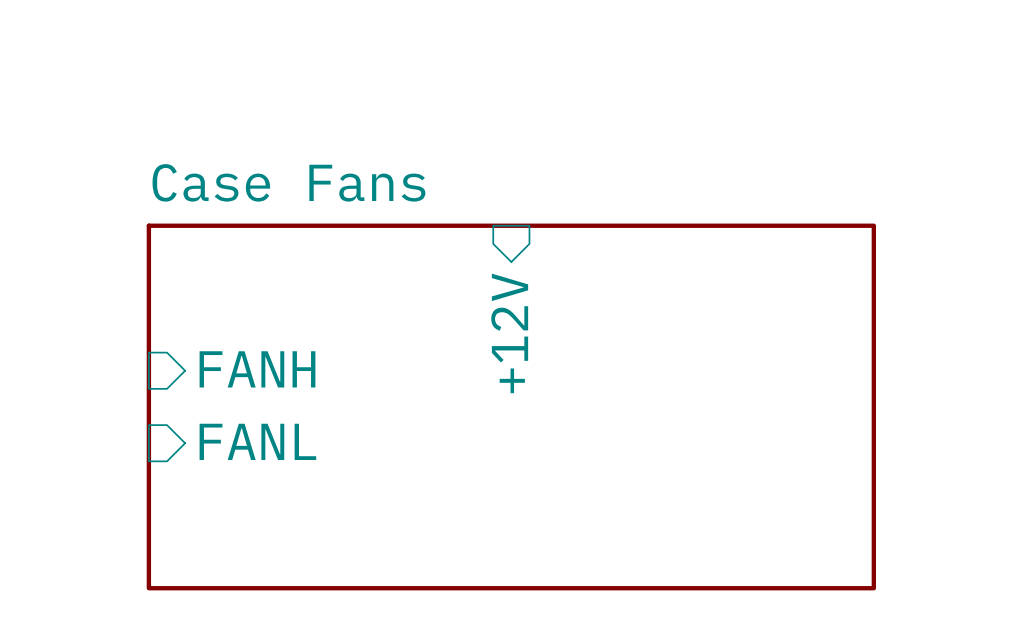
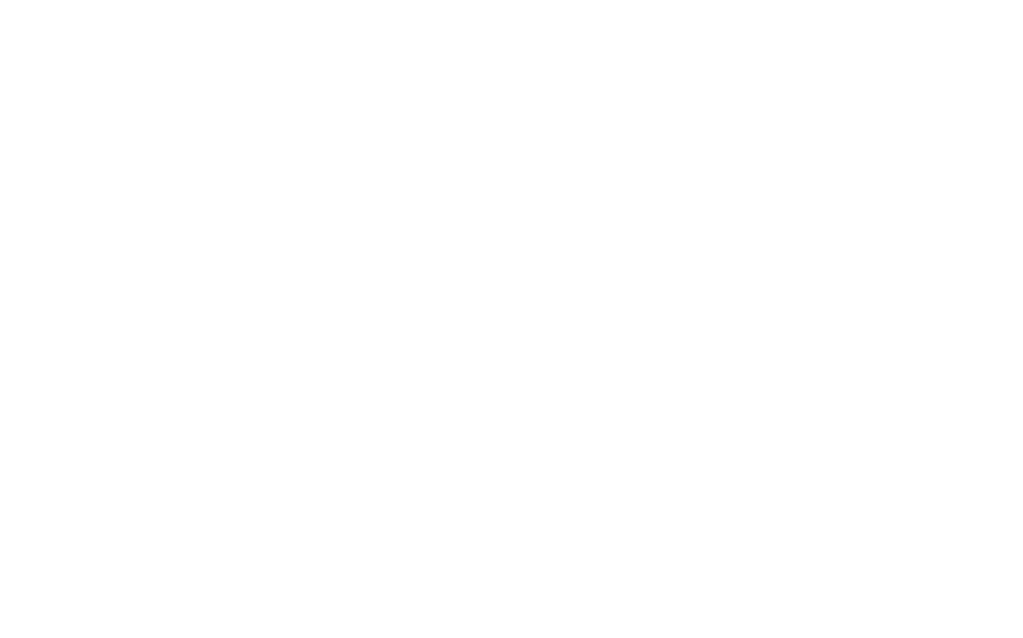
sheet pin: +12V (509, 333) -> none
sheet pin: FANH (257, 369) -> none
sheet Case Fans: (511, 406) -> none
sheet pin: FANL (257, 441) -> none

